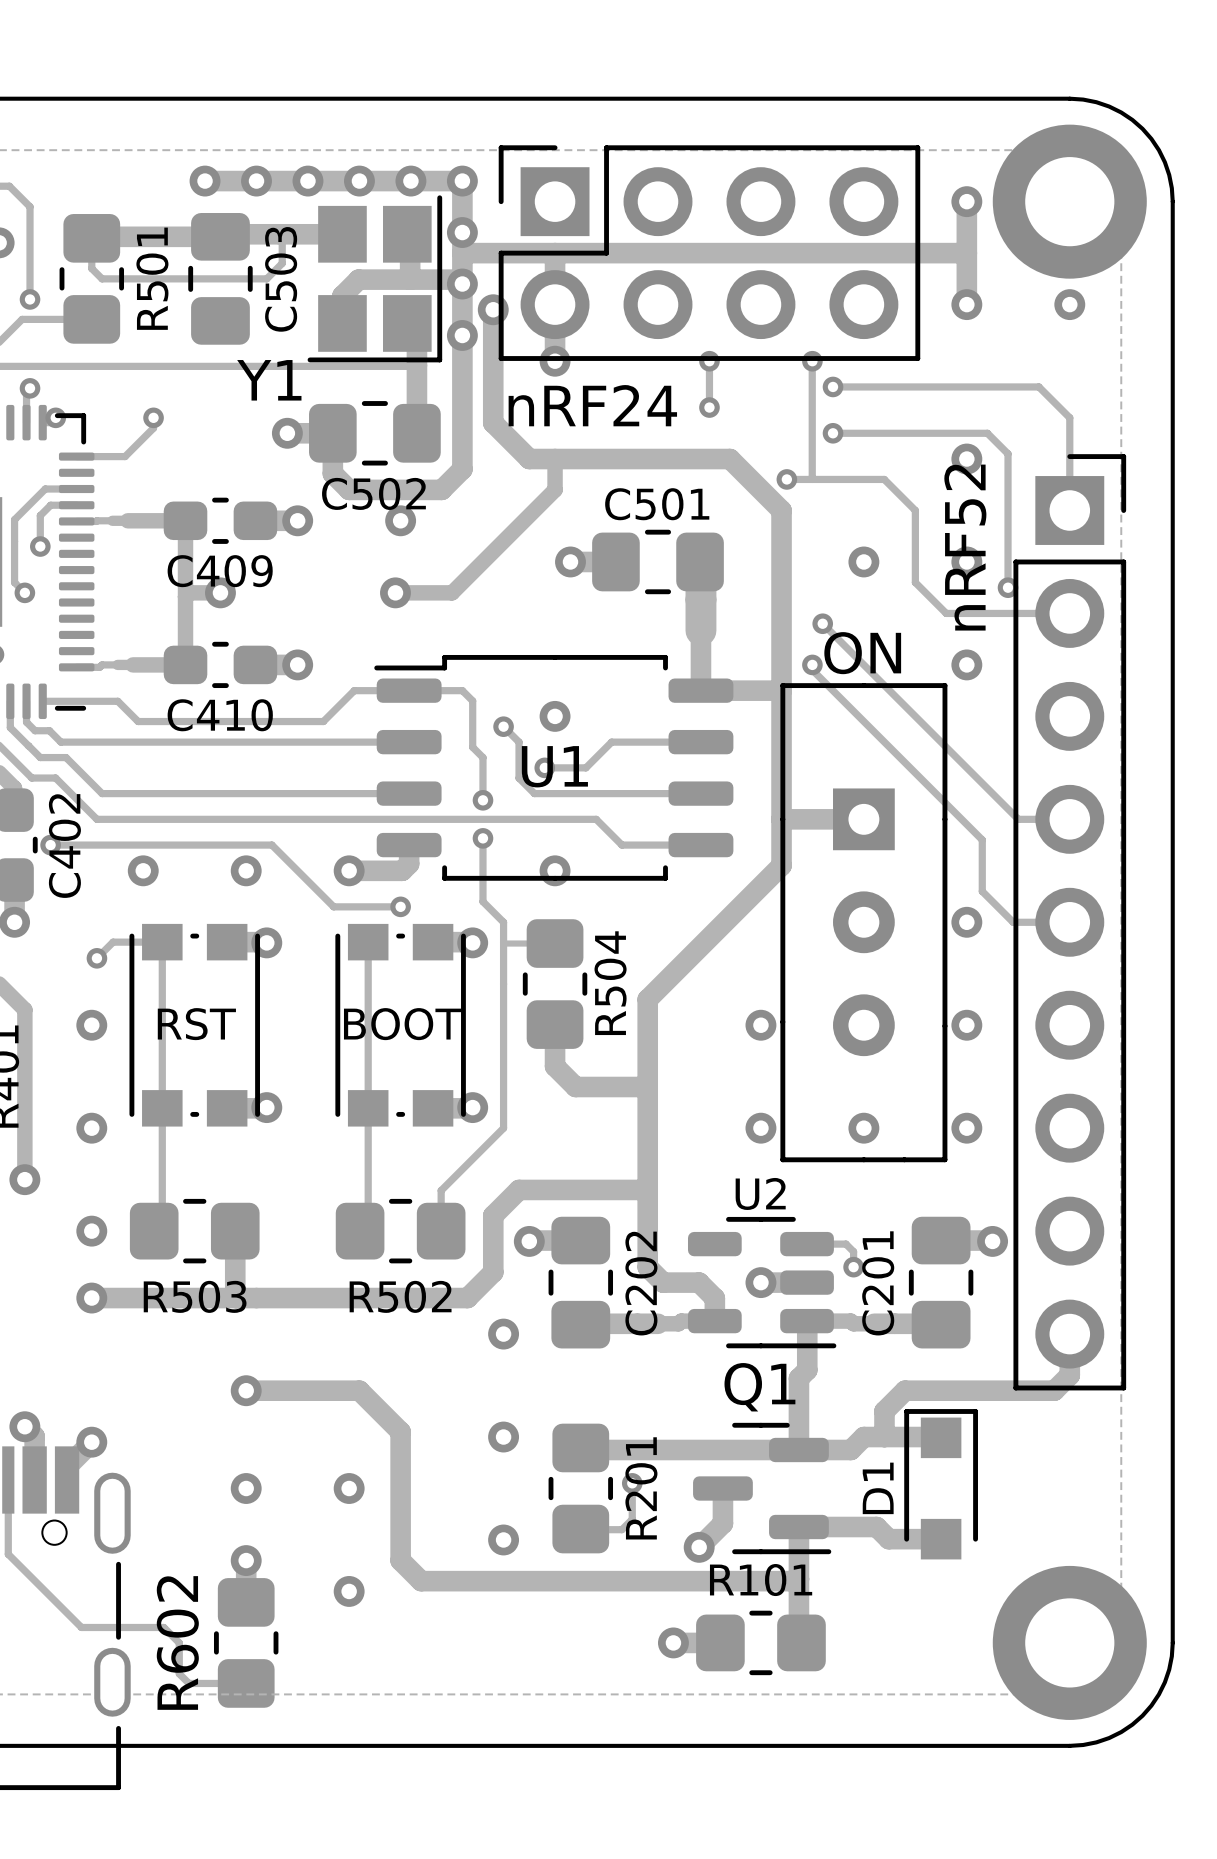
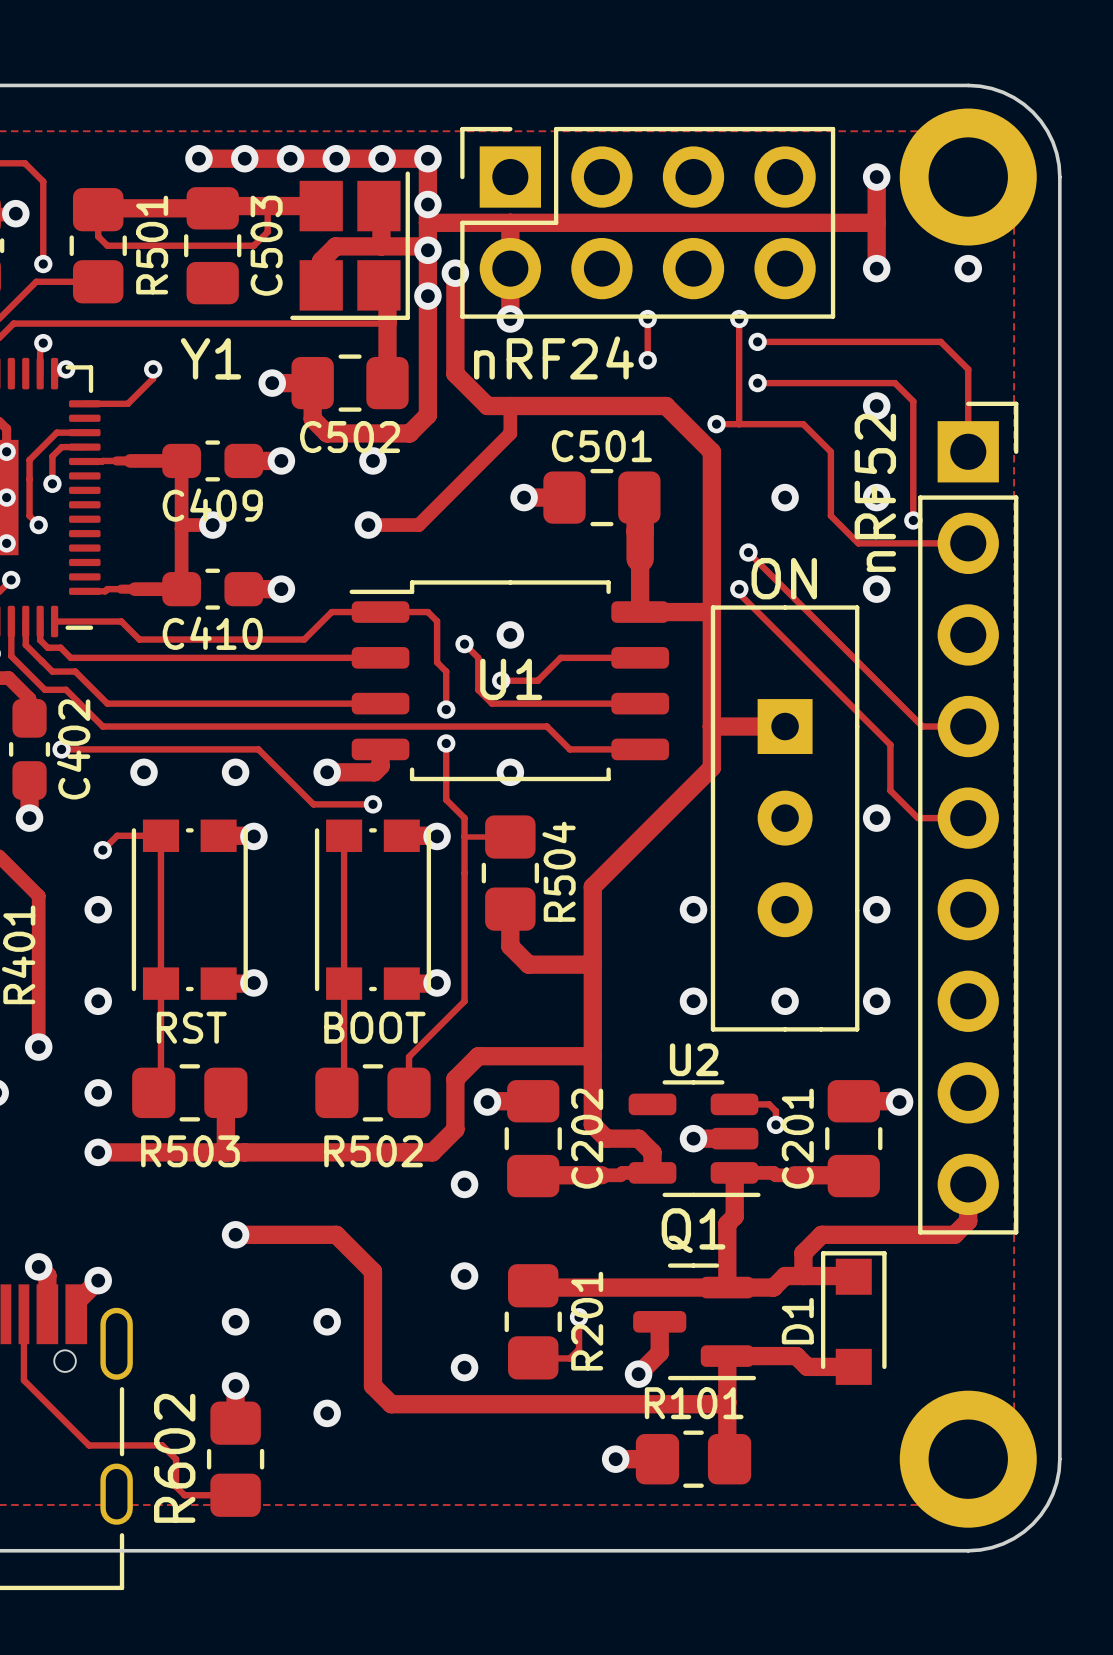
Y1 name position: Y1 (269, 380) -> Y1 (210, 358)
text position: RST (196, 1024) -> RST (191, 1027)
text position: BOOT (402, 1024) -> BOOT (374, 1027)

